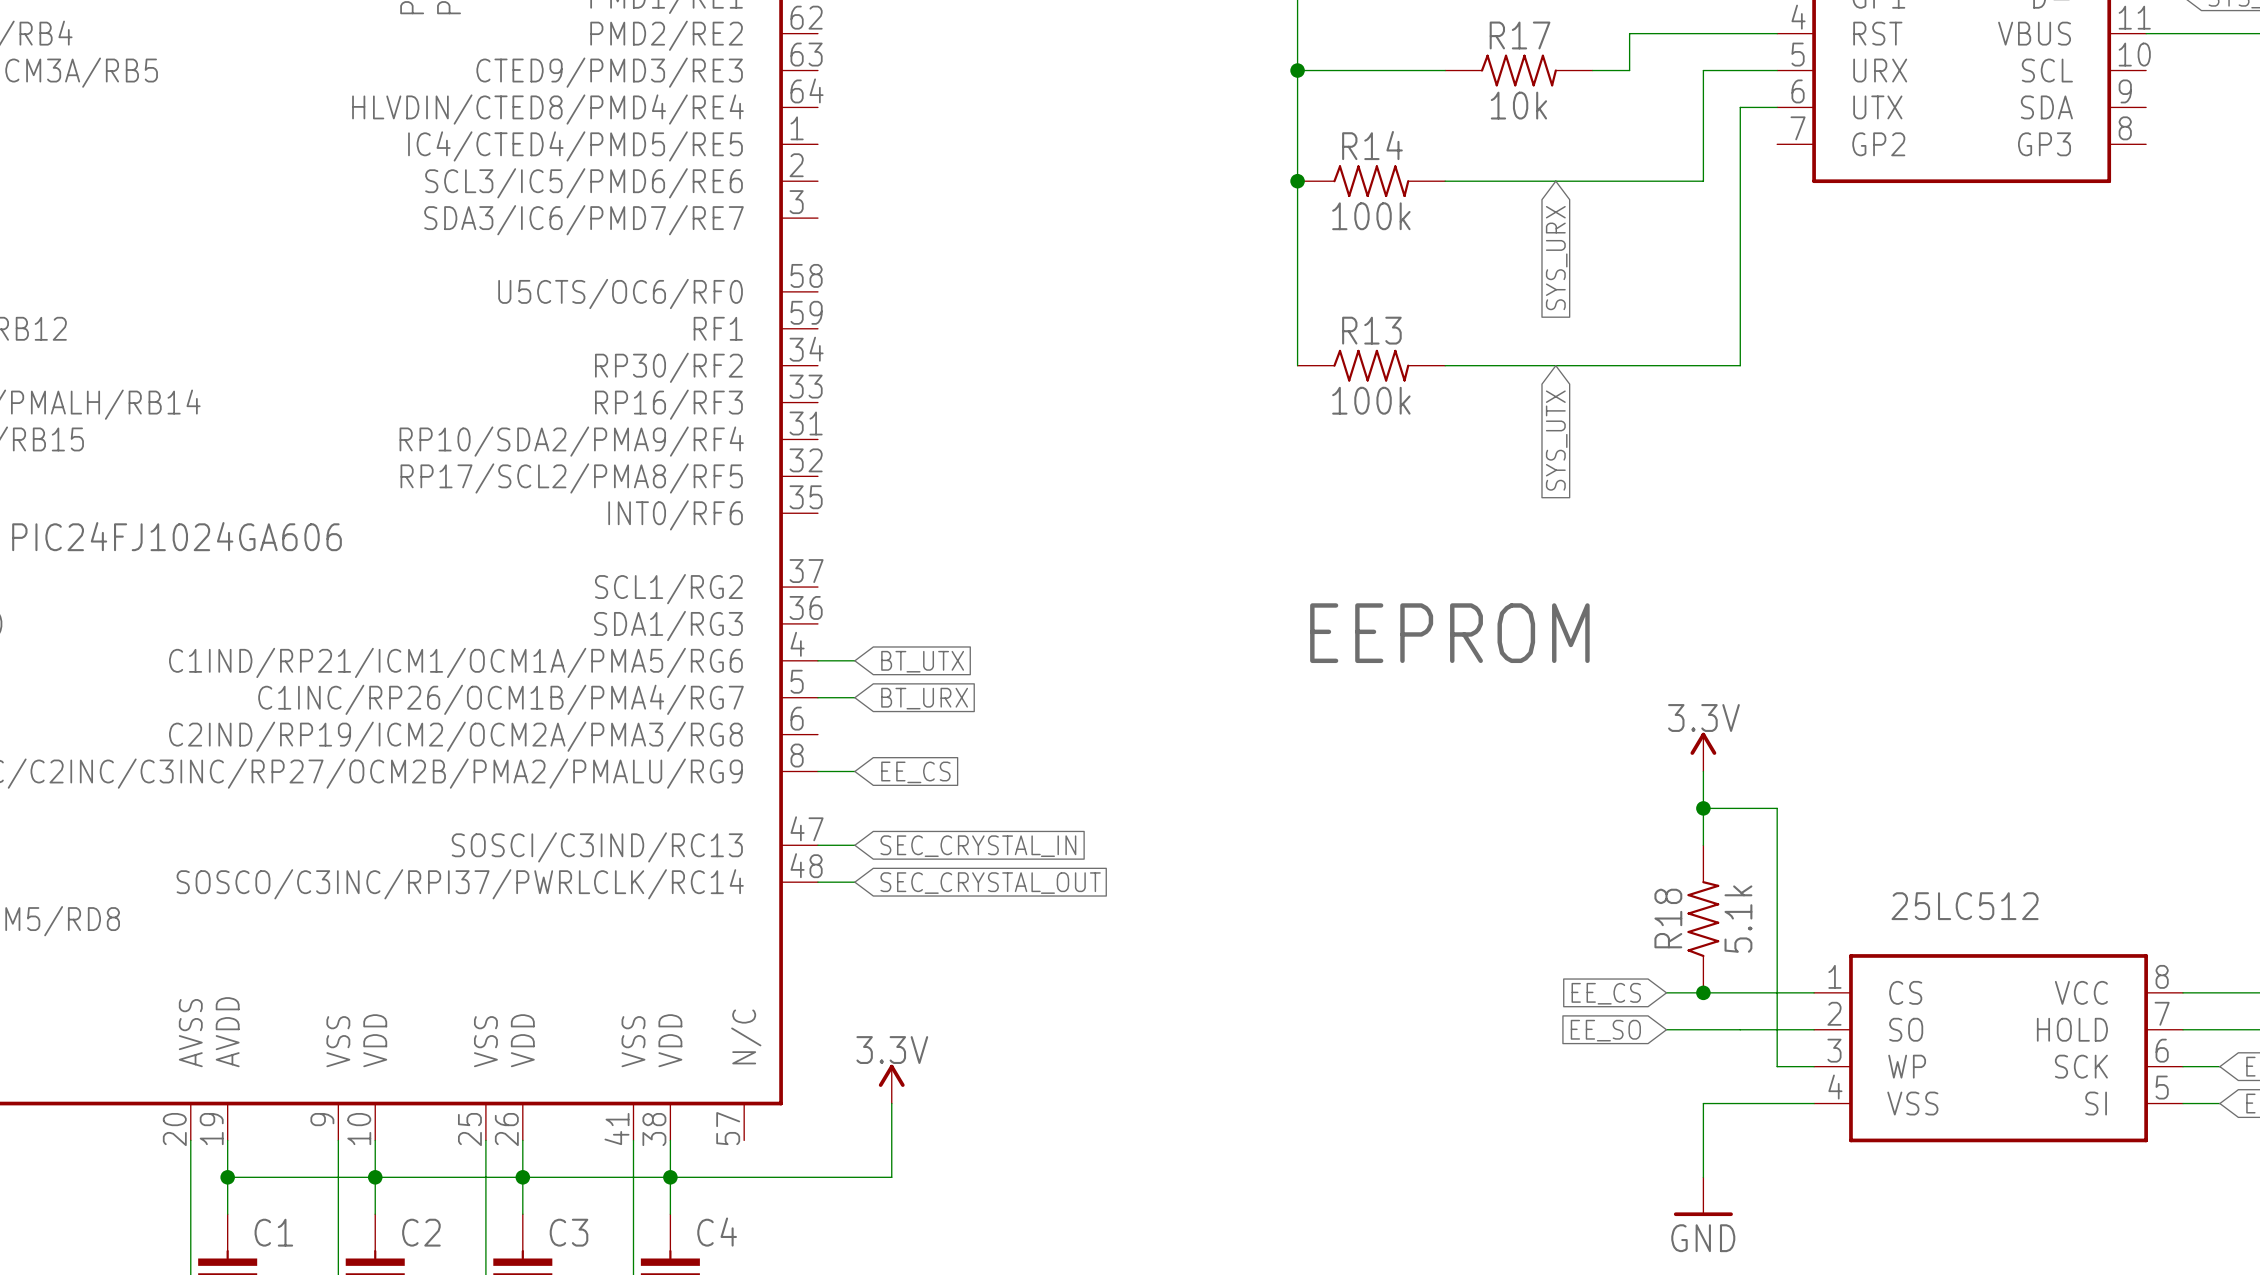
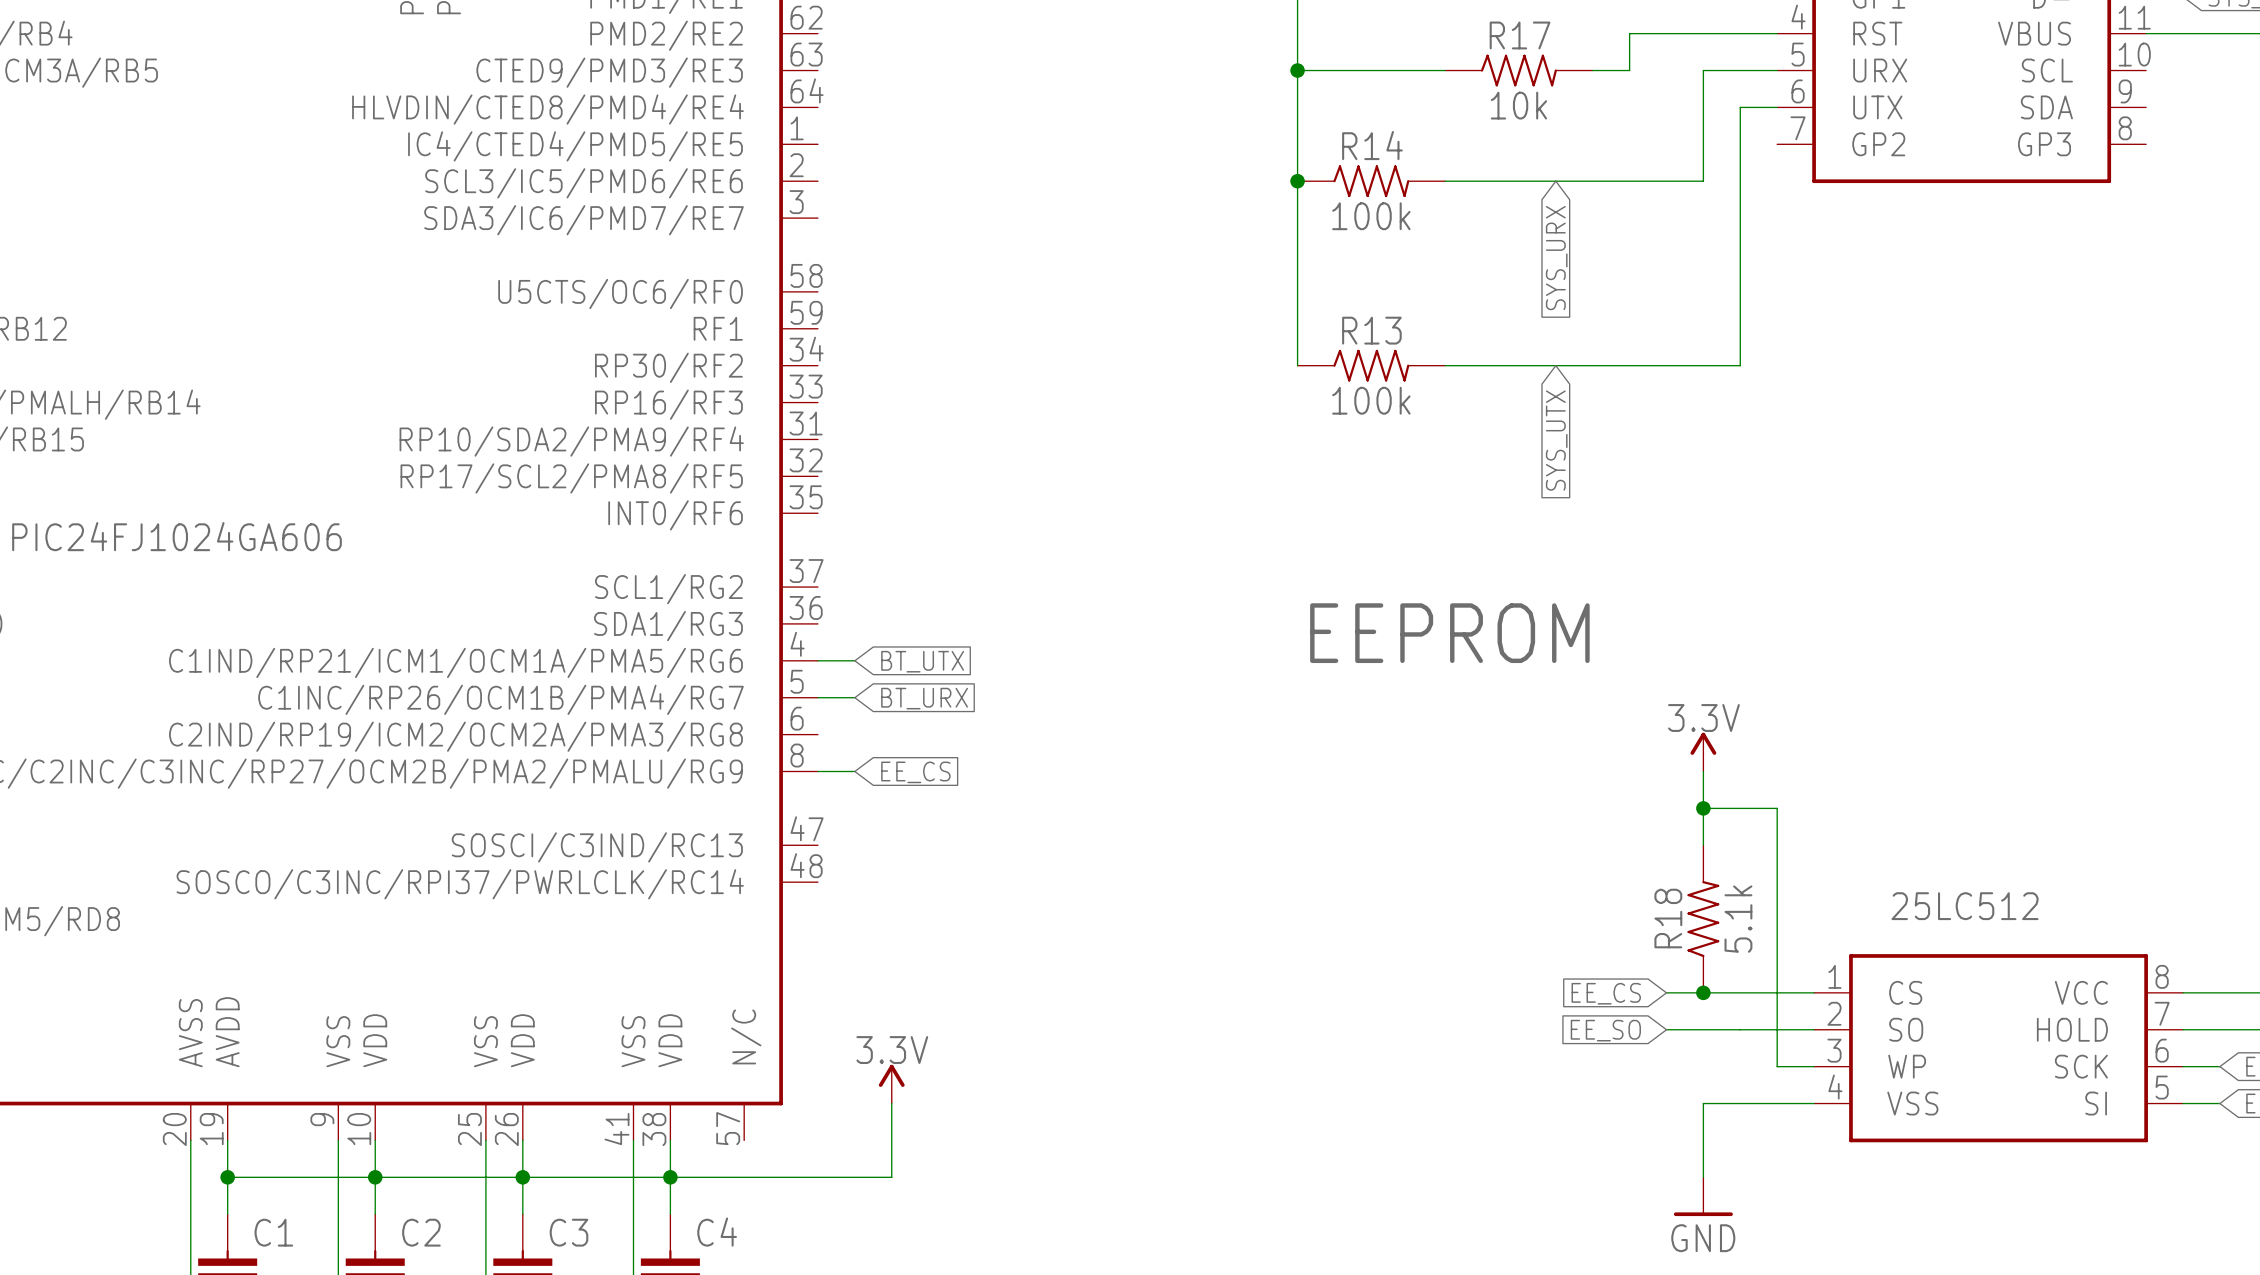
wire: (817, 845) (854, 845) -> none
global label: SEC_CRYSTAL_IN (978, 846) -> none
wire: (817, 882) (854, 882) -> none
global label: SEC_CRYSTAL_OUT (990, 883) -> none

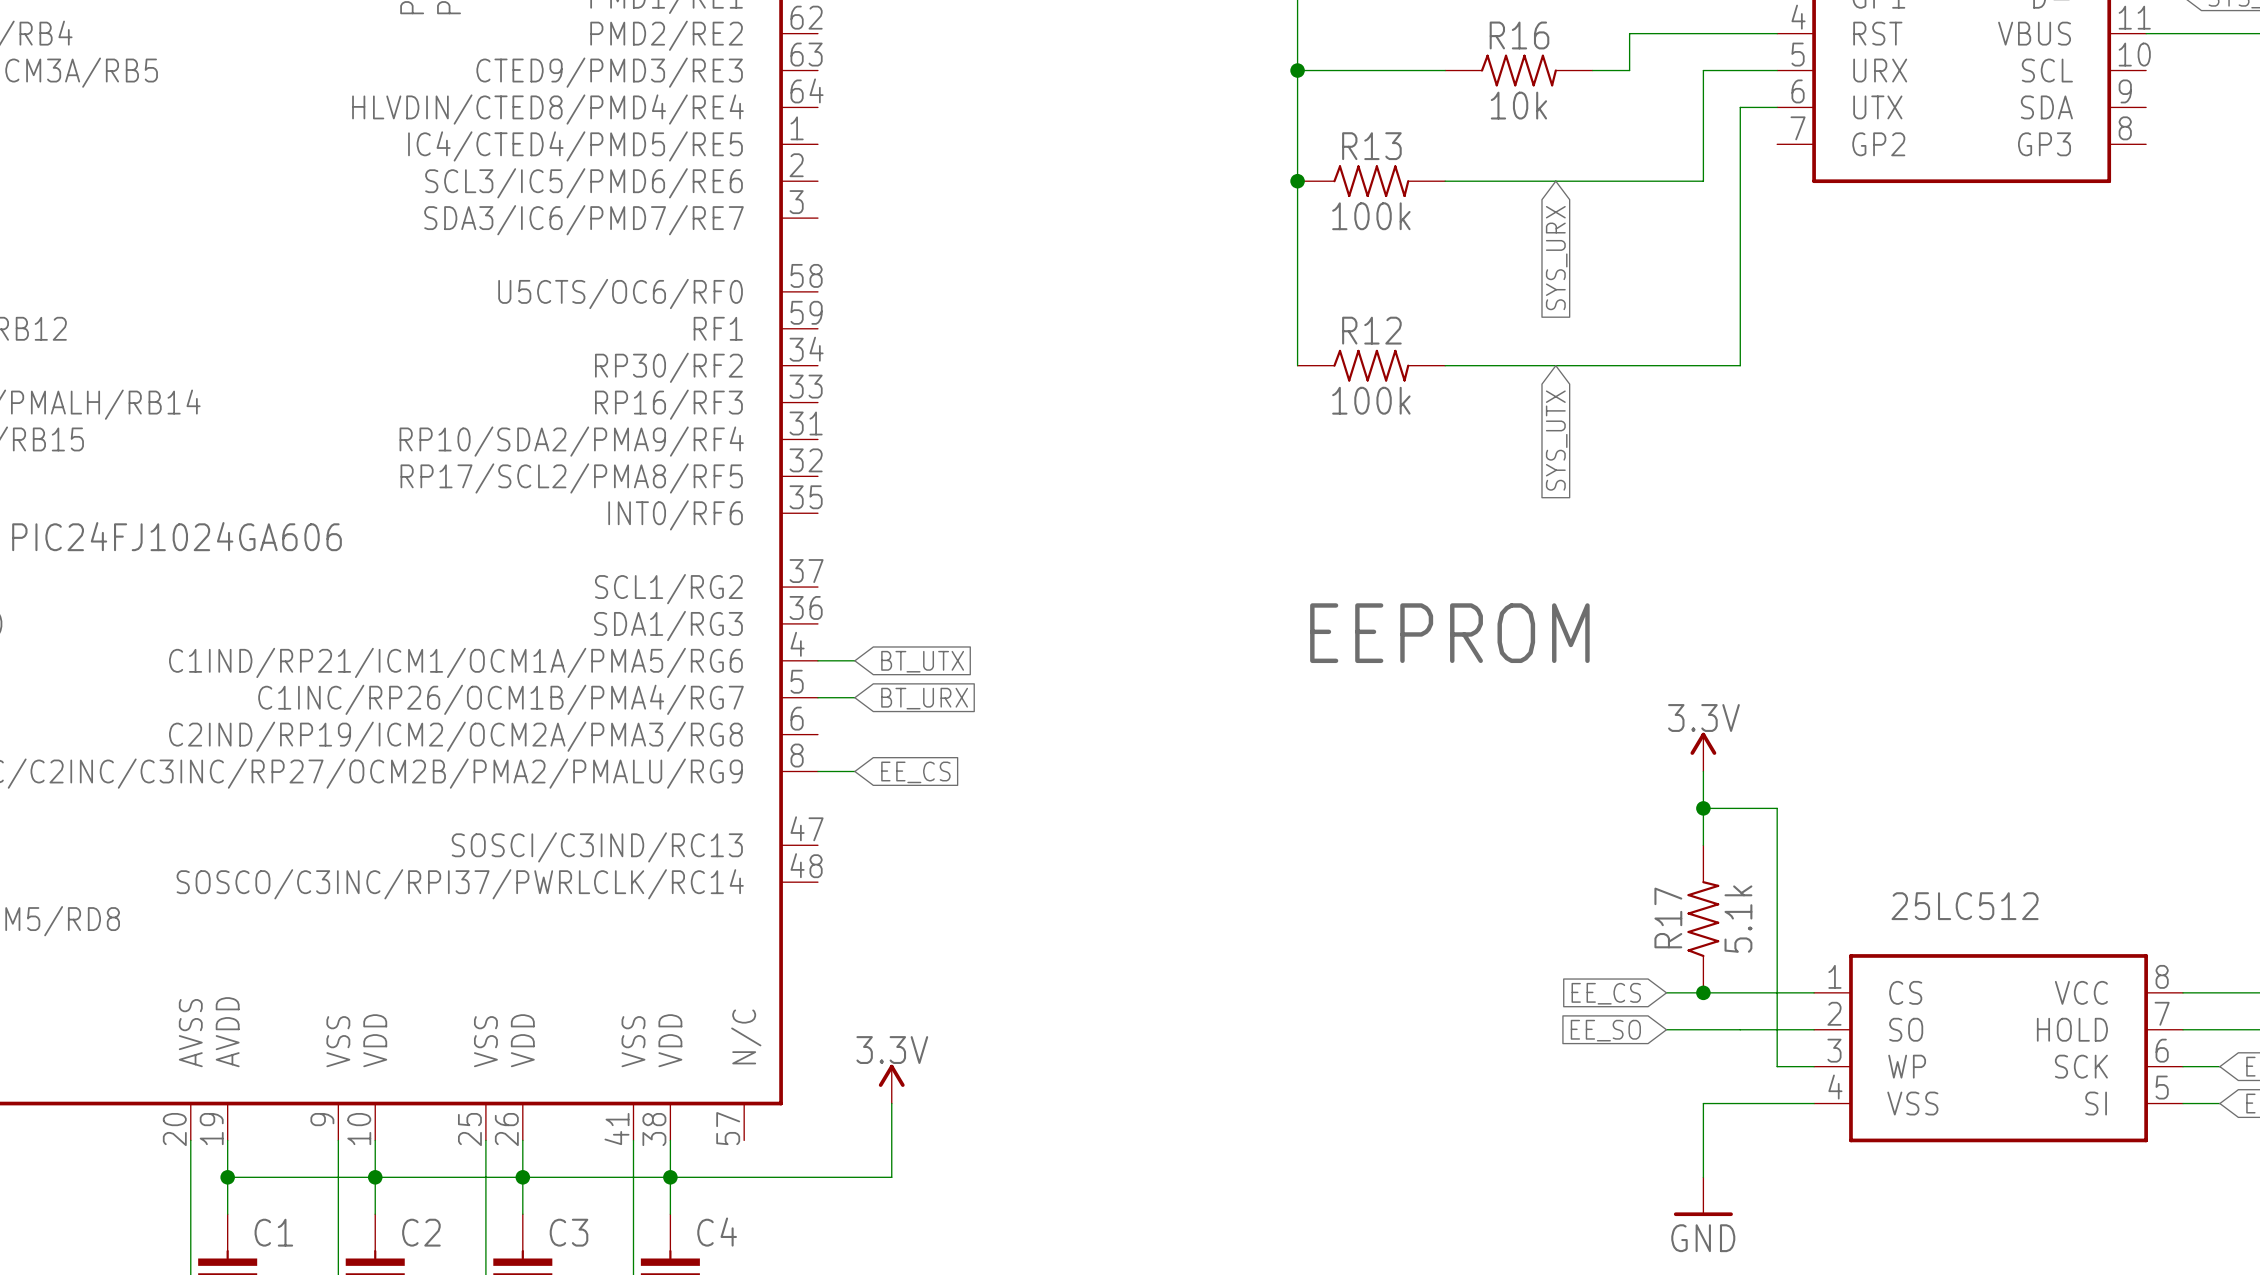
R17 name: R17 (1520, 35) -> R16 (1519, 35)
R14 name: R14 (1372, 145) -> R13 (1371, 146)
R13 name: R13 (1371, 330) -> R12 (1371, 330)
R18 name: R18 (1668, 918) -> R17 (1668, 917)

